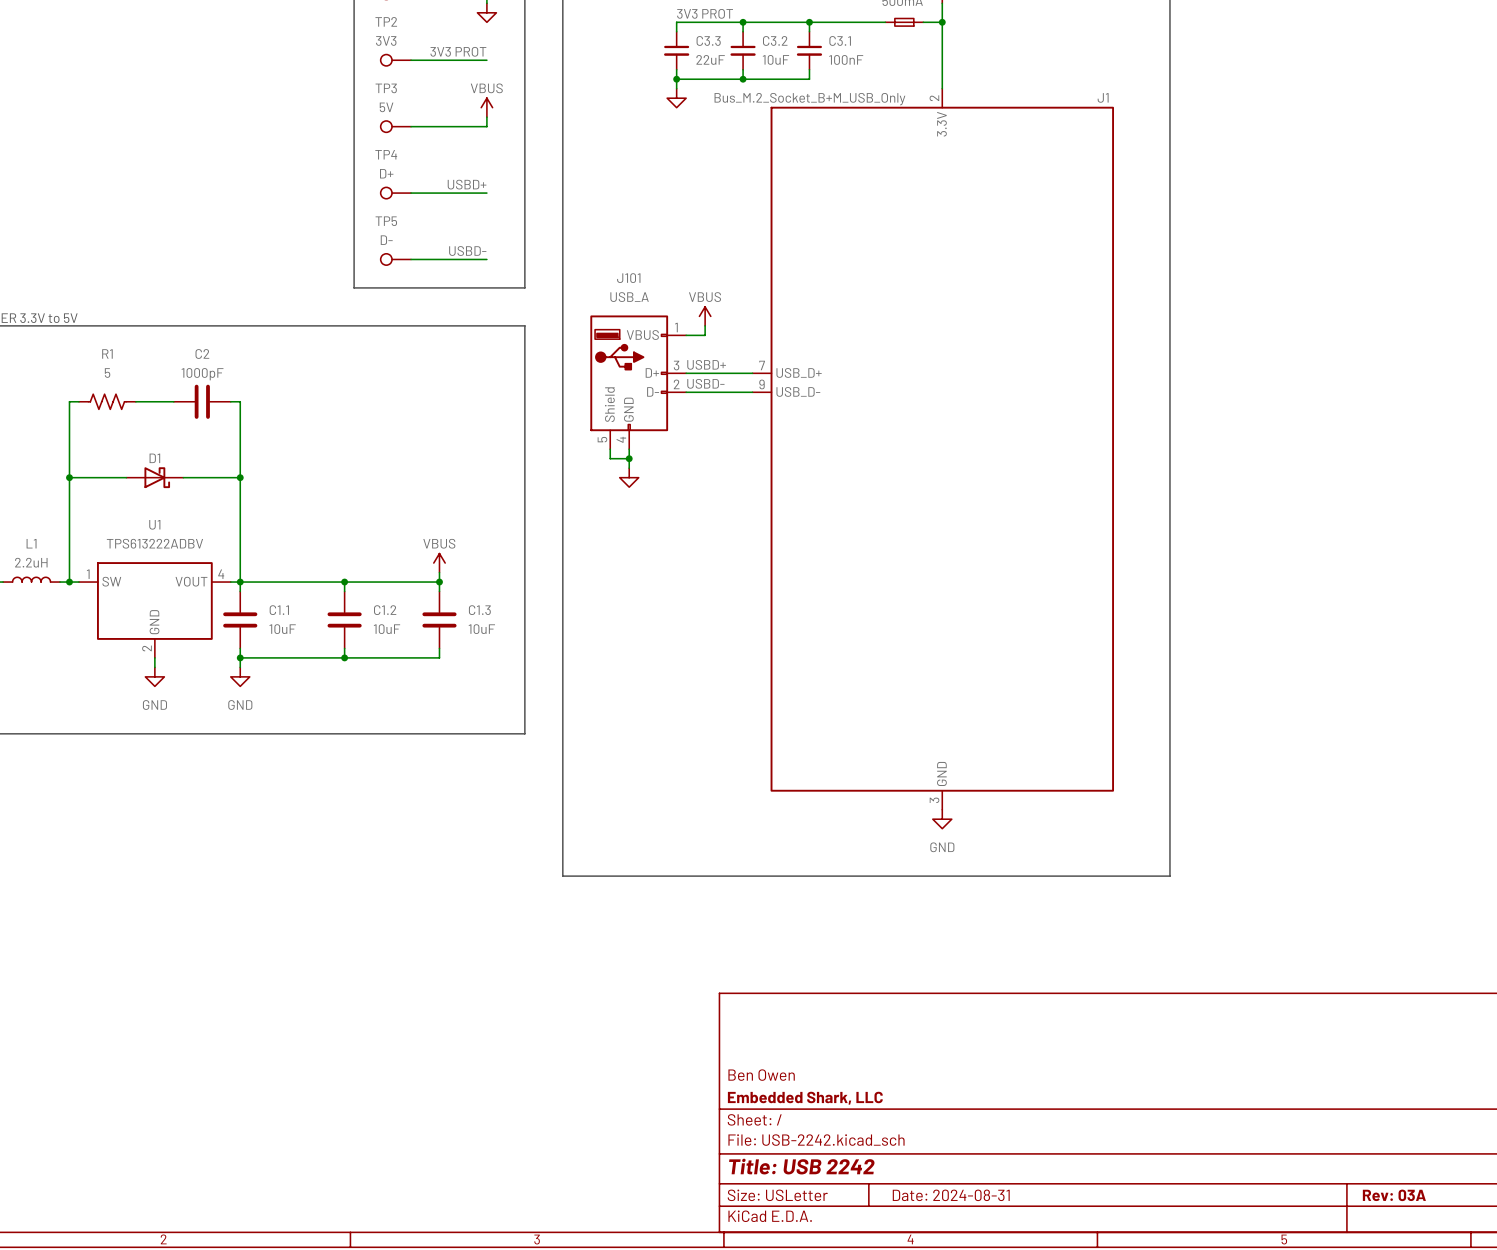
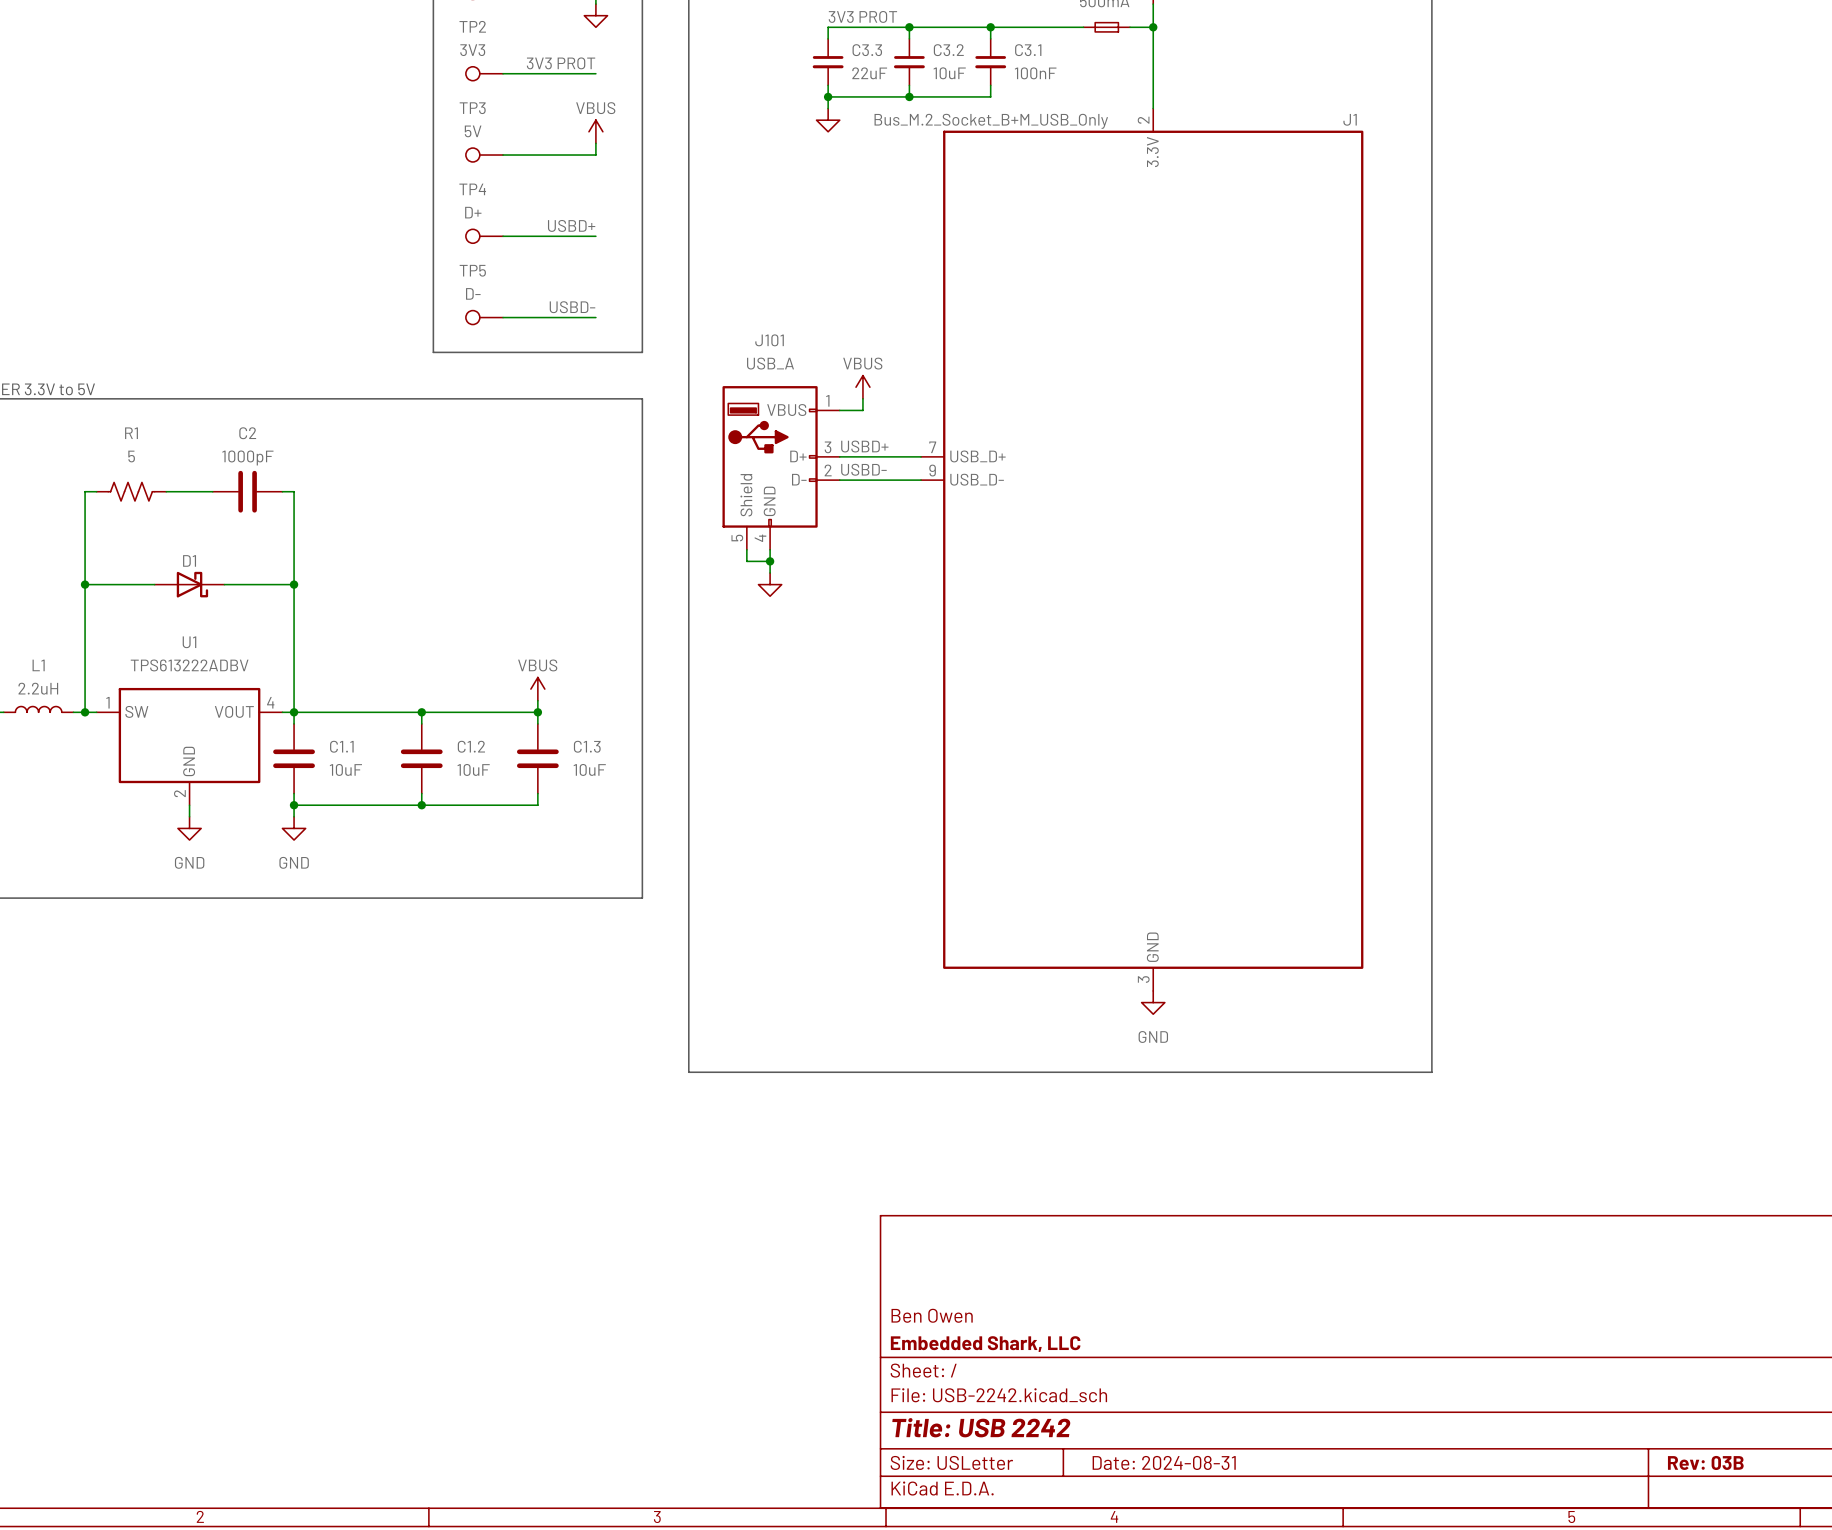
title block: Rev: 03A (1394, 1195) -> Rev: 03B (1705, 1462)

